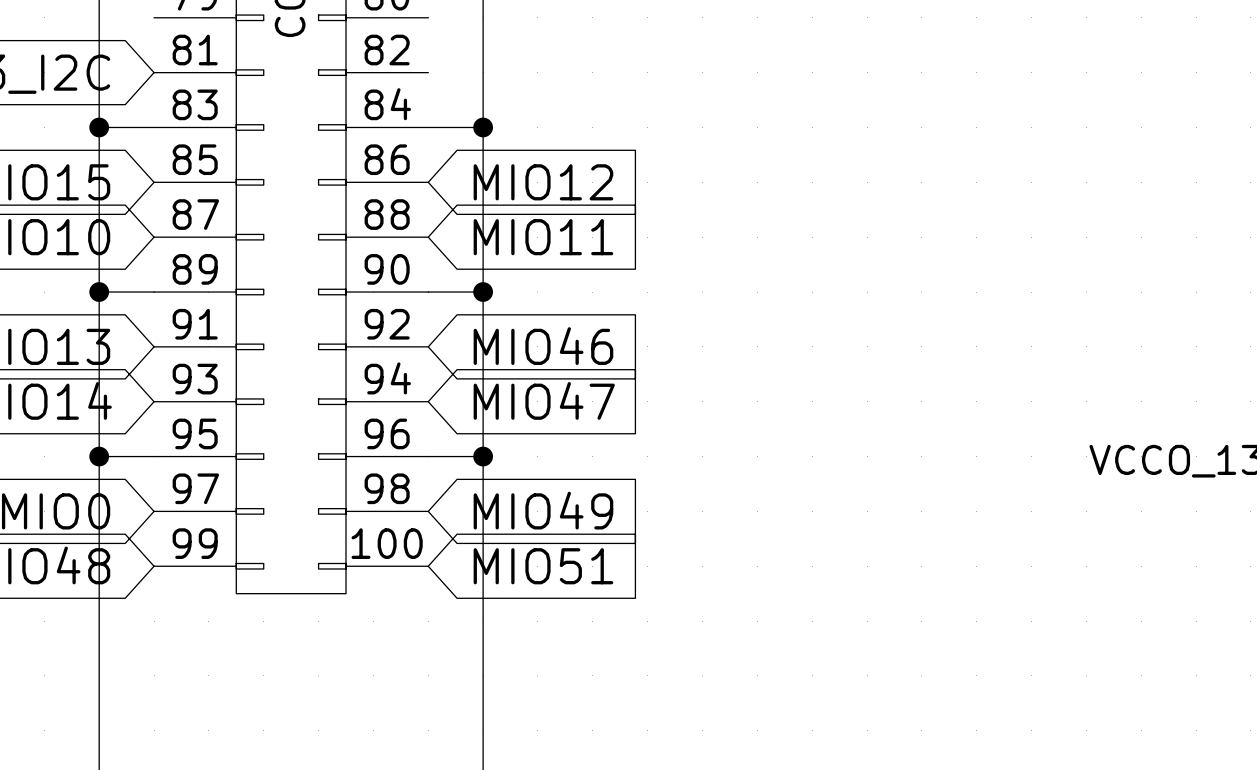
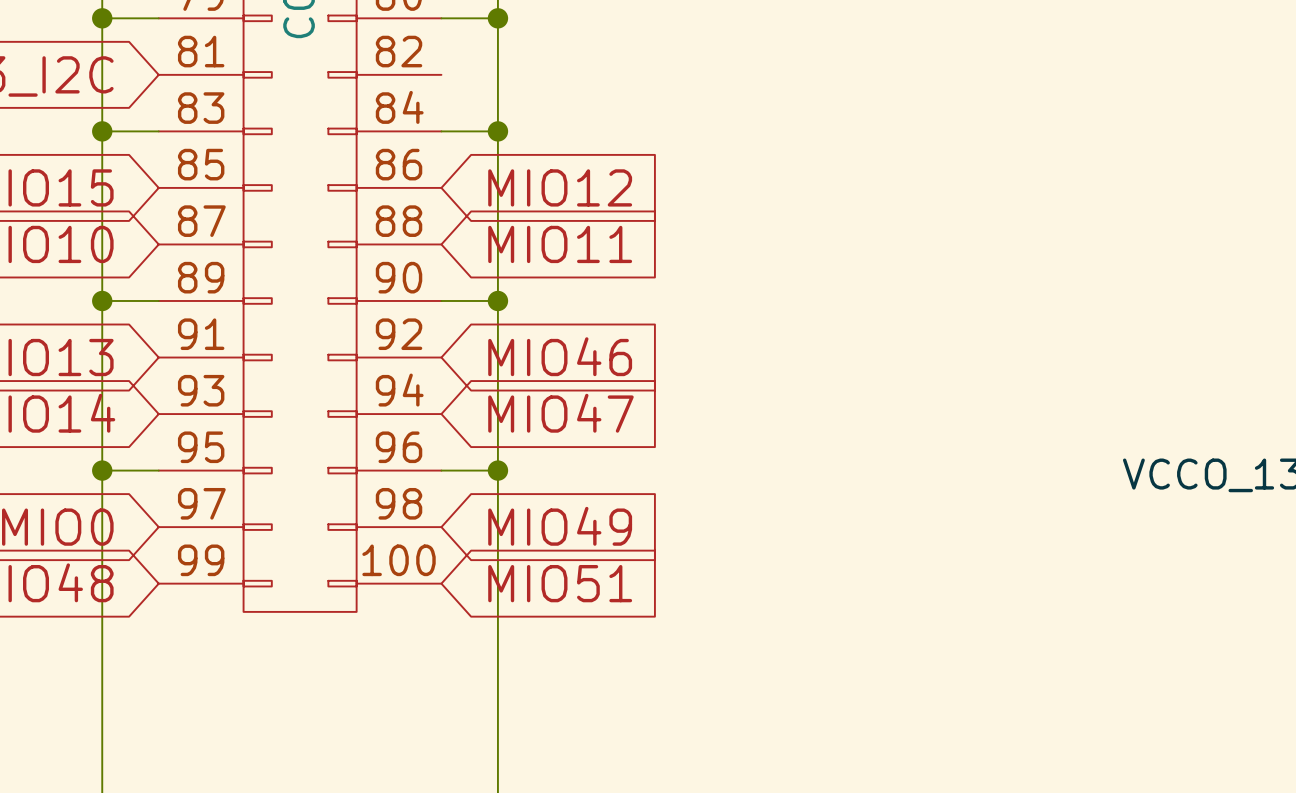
wire: none -> (102, 18) (158, 18)
junction: none -> (102, 18)
wire: none -> (441, 18) (497, 18)
junction: none -> (497, 18)

